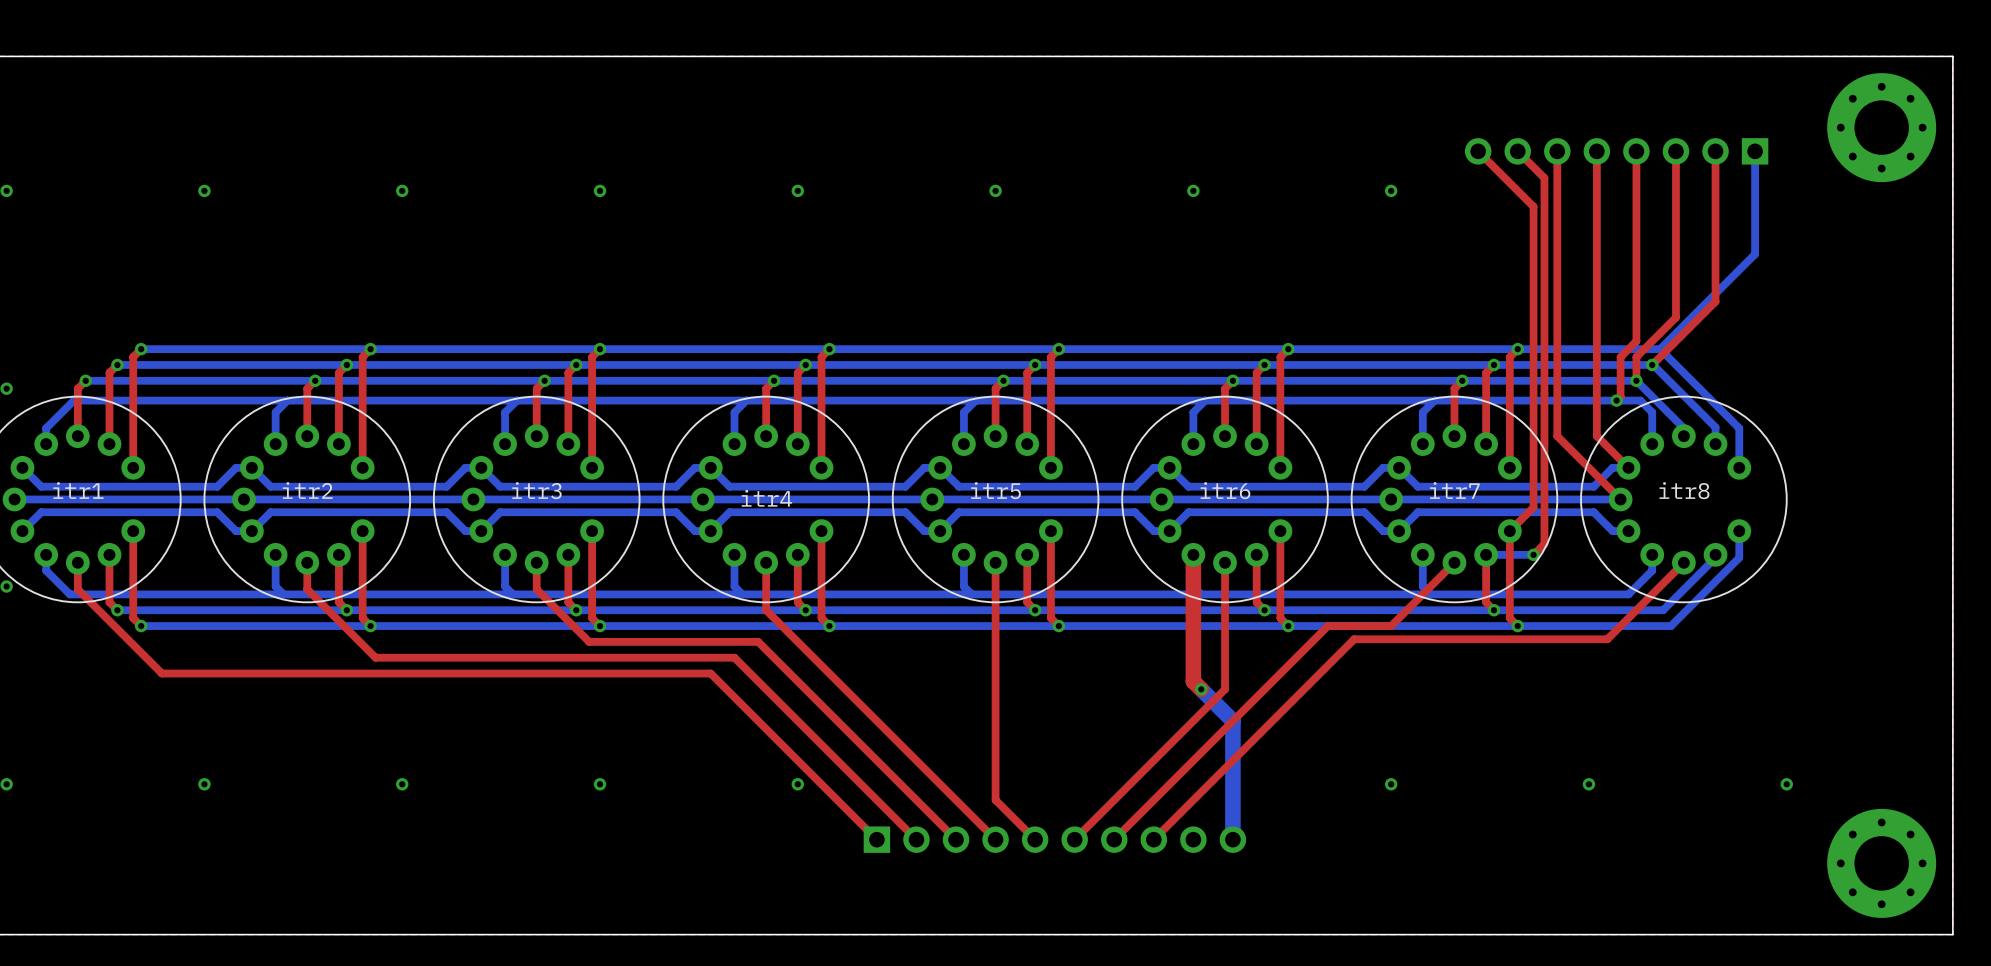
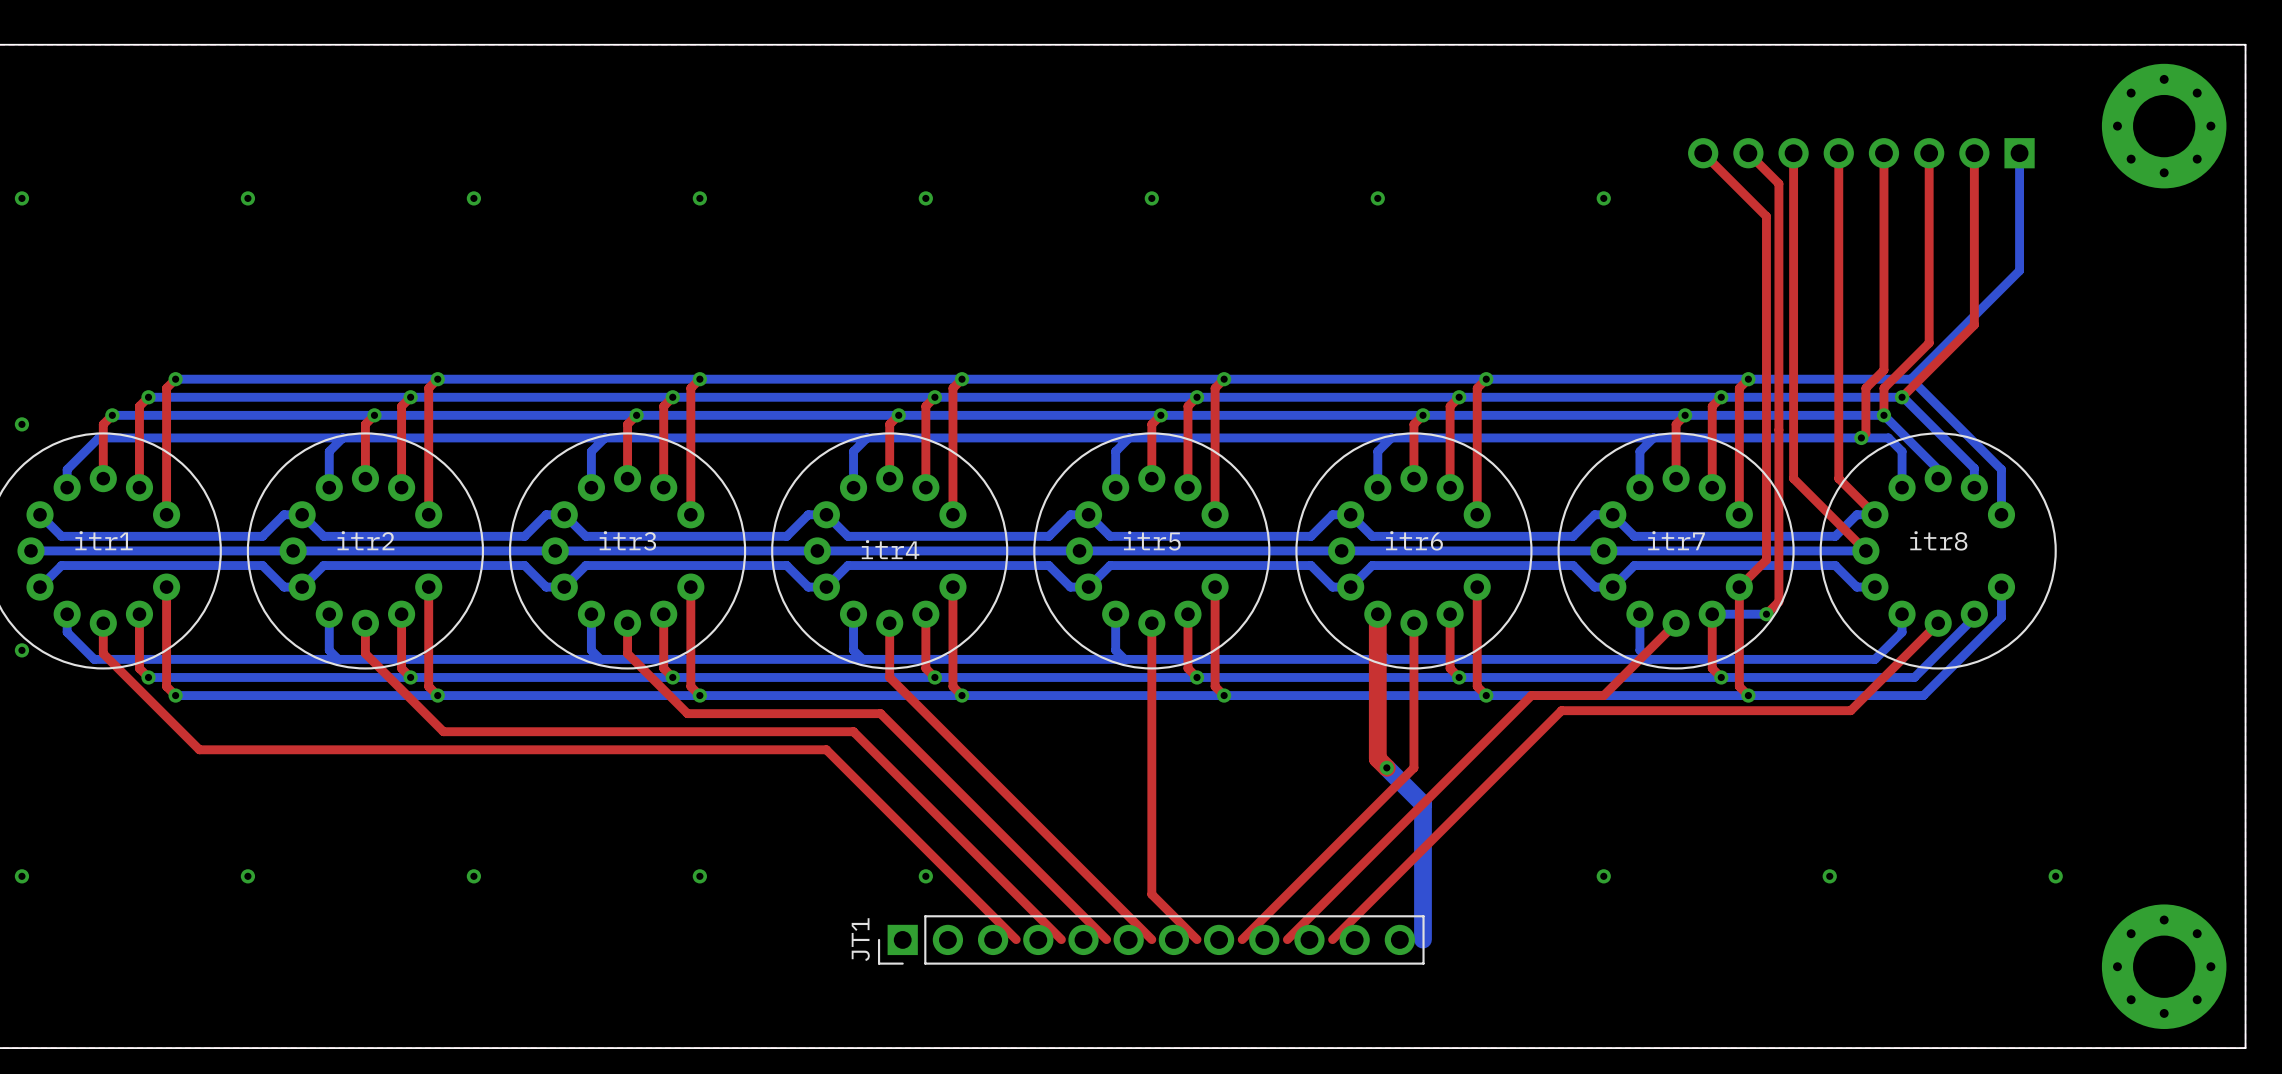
JT1: none -> (1151, 939)
part: (1054, 839) -> none

